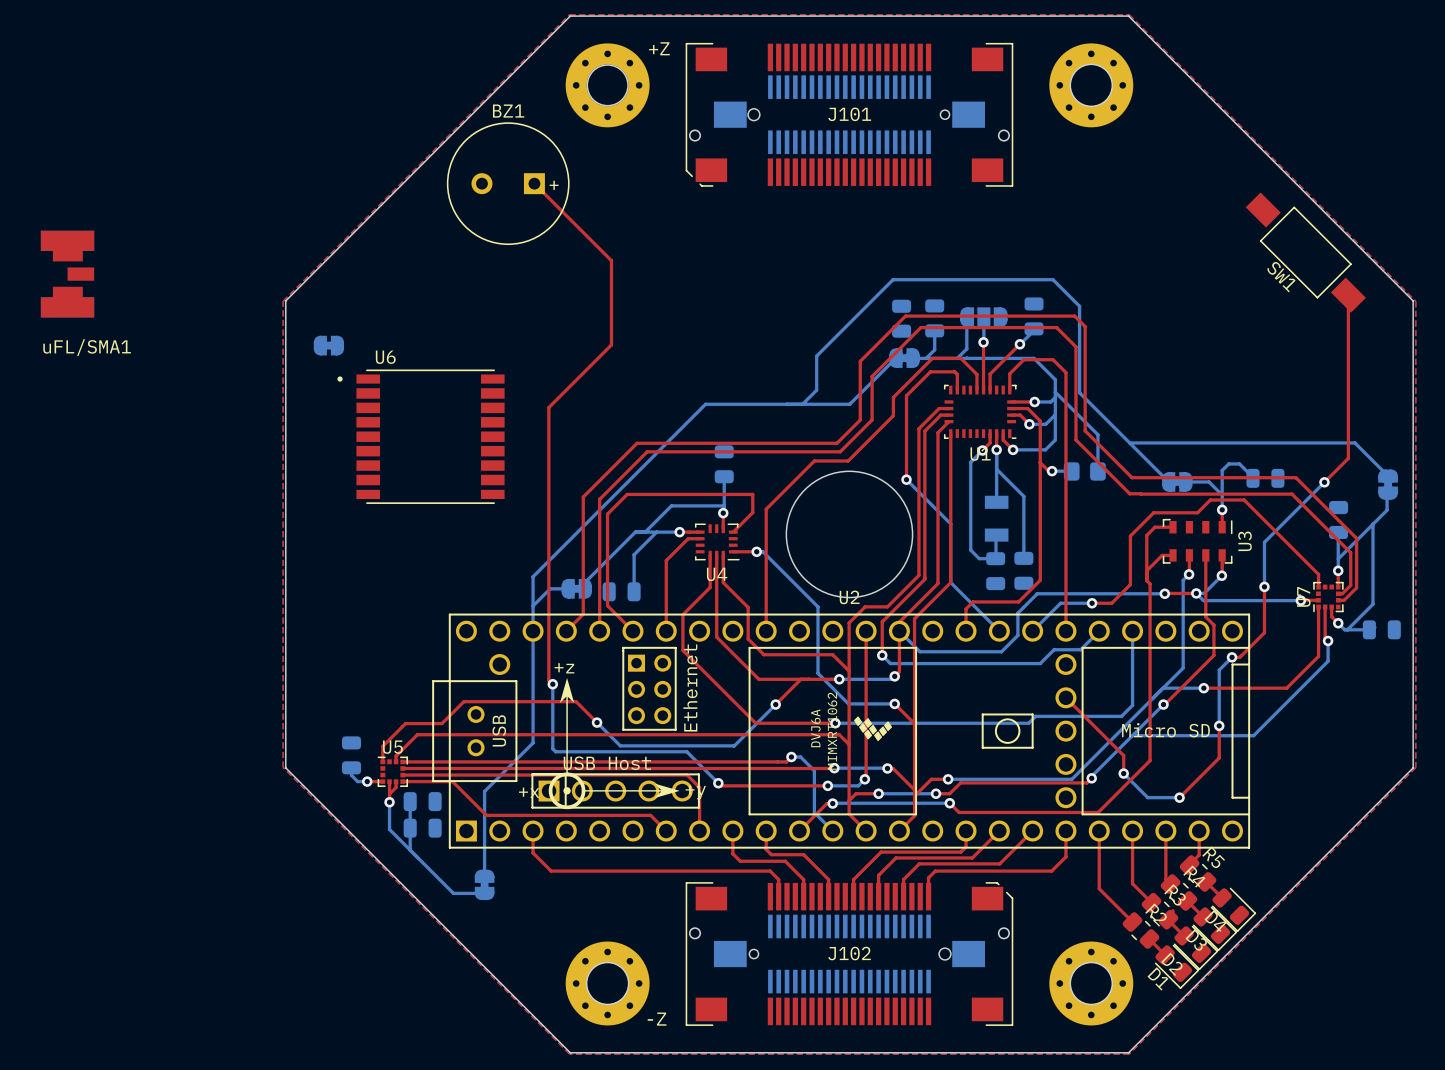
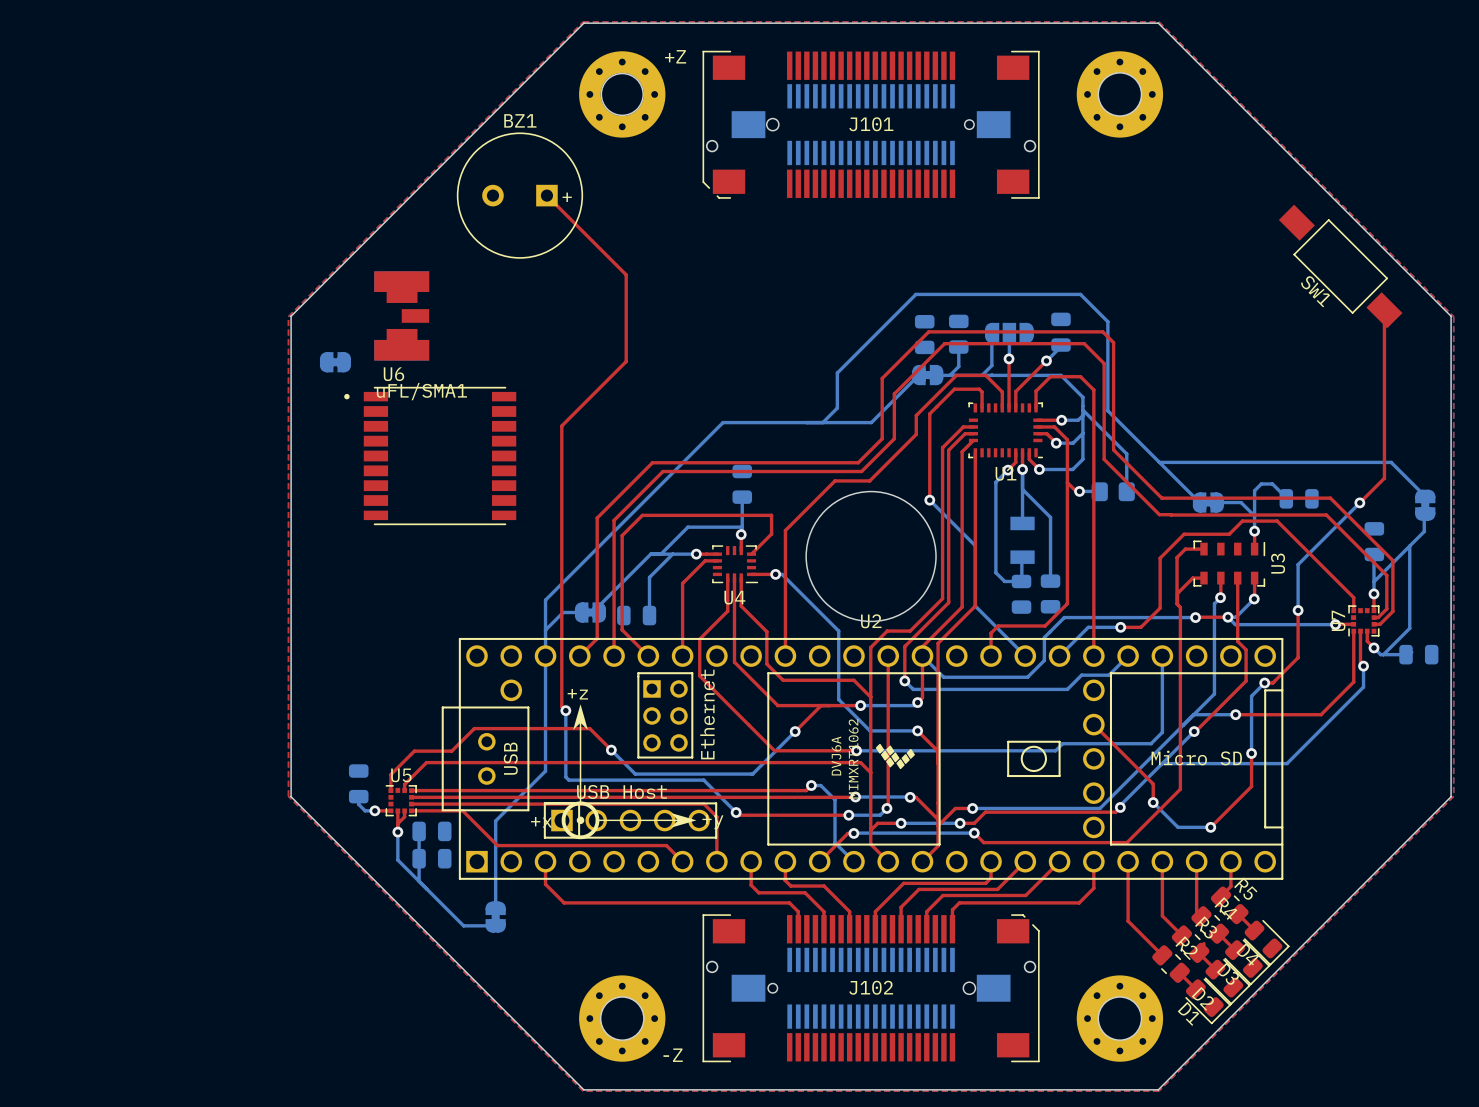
uFL/SMA1 position: (67, 274) -> (401, 315)

